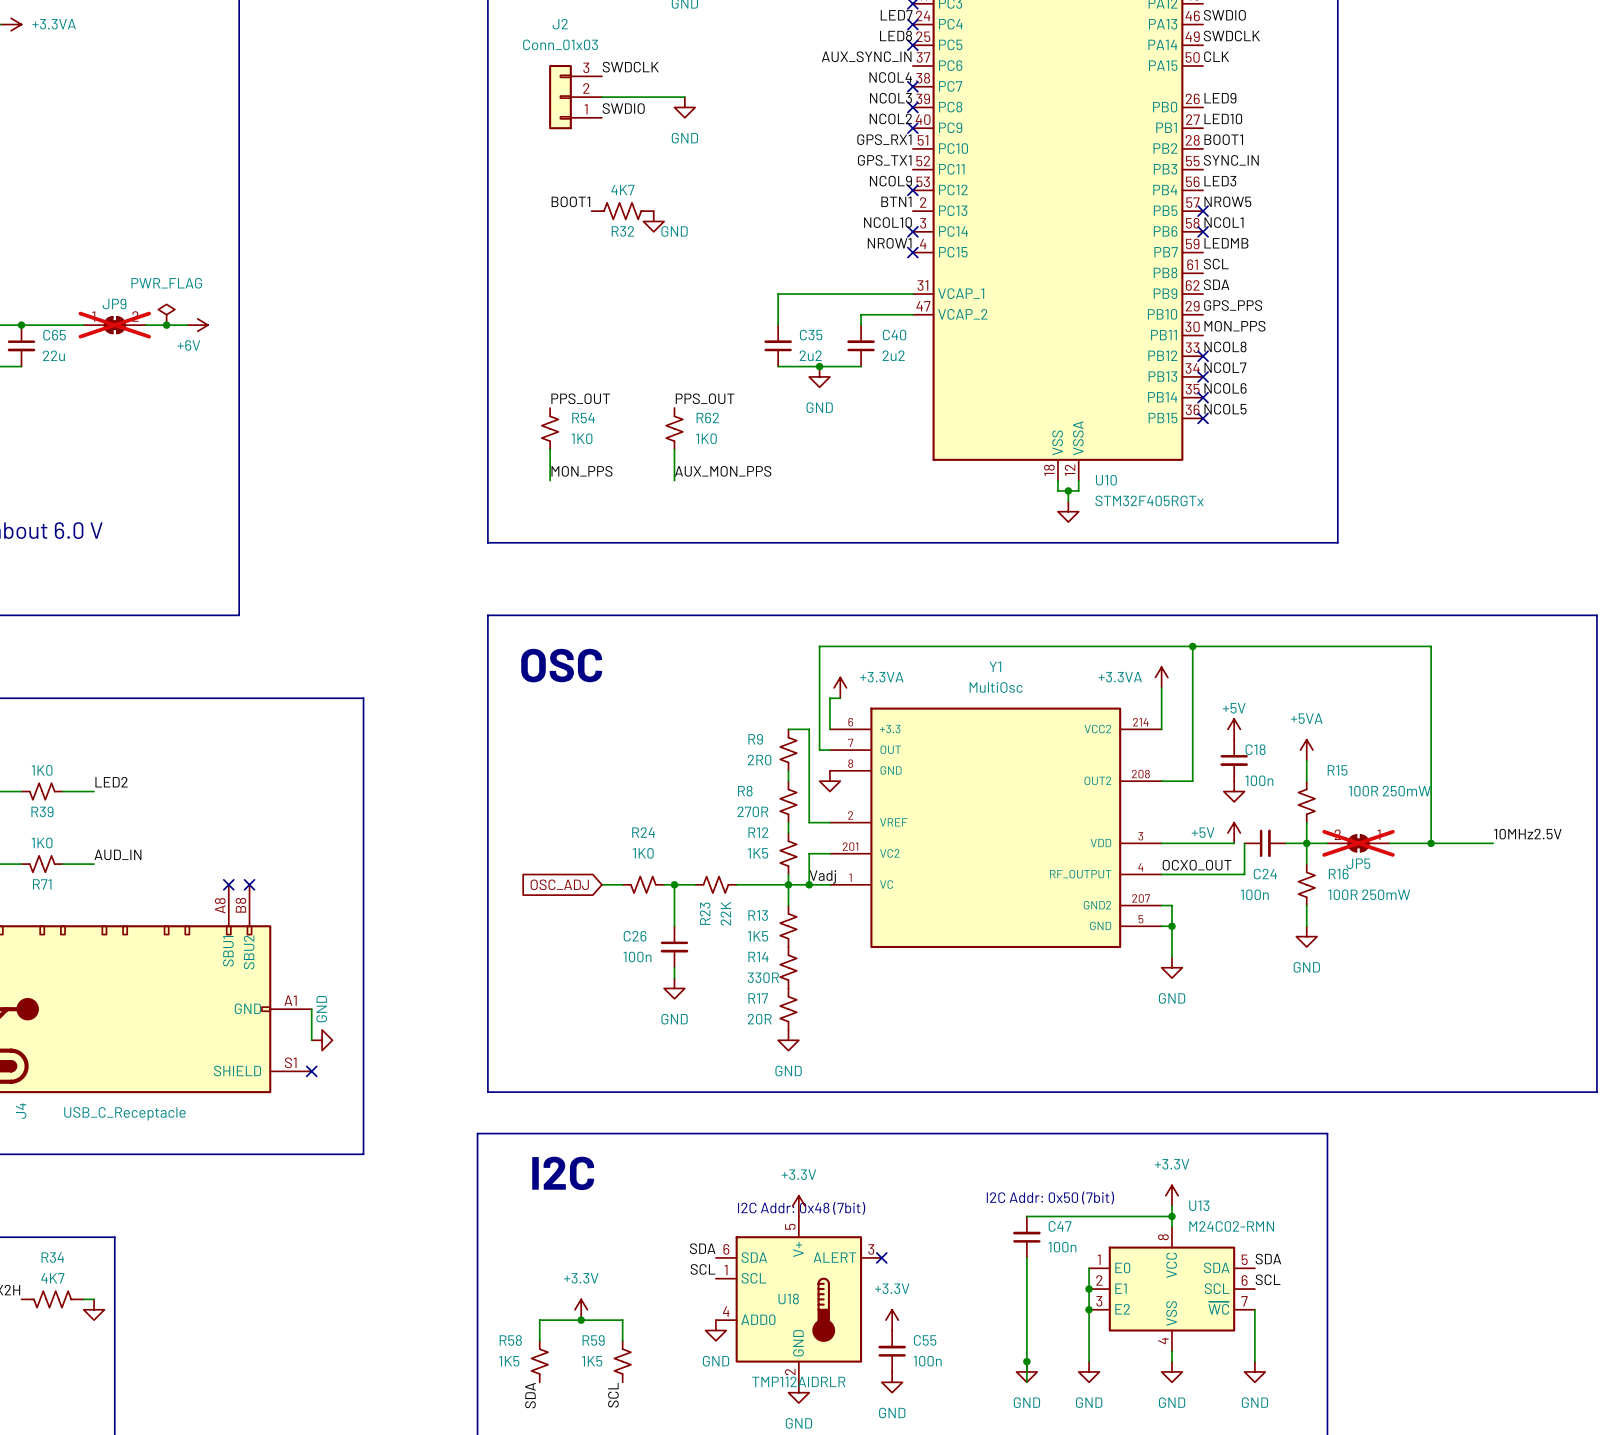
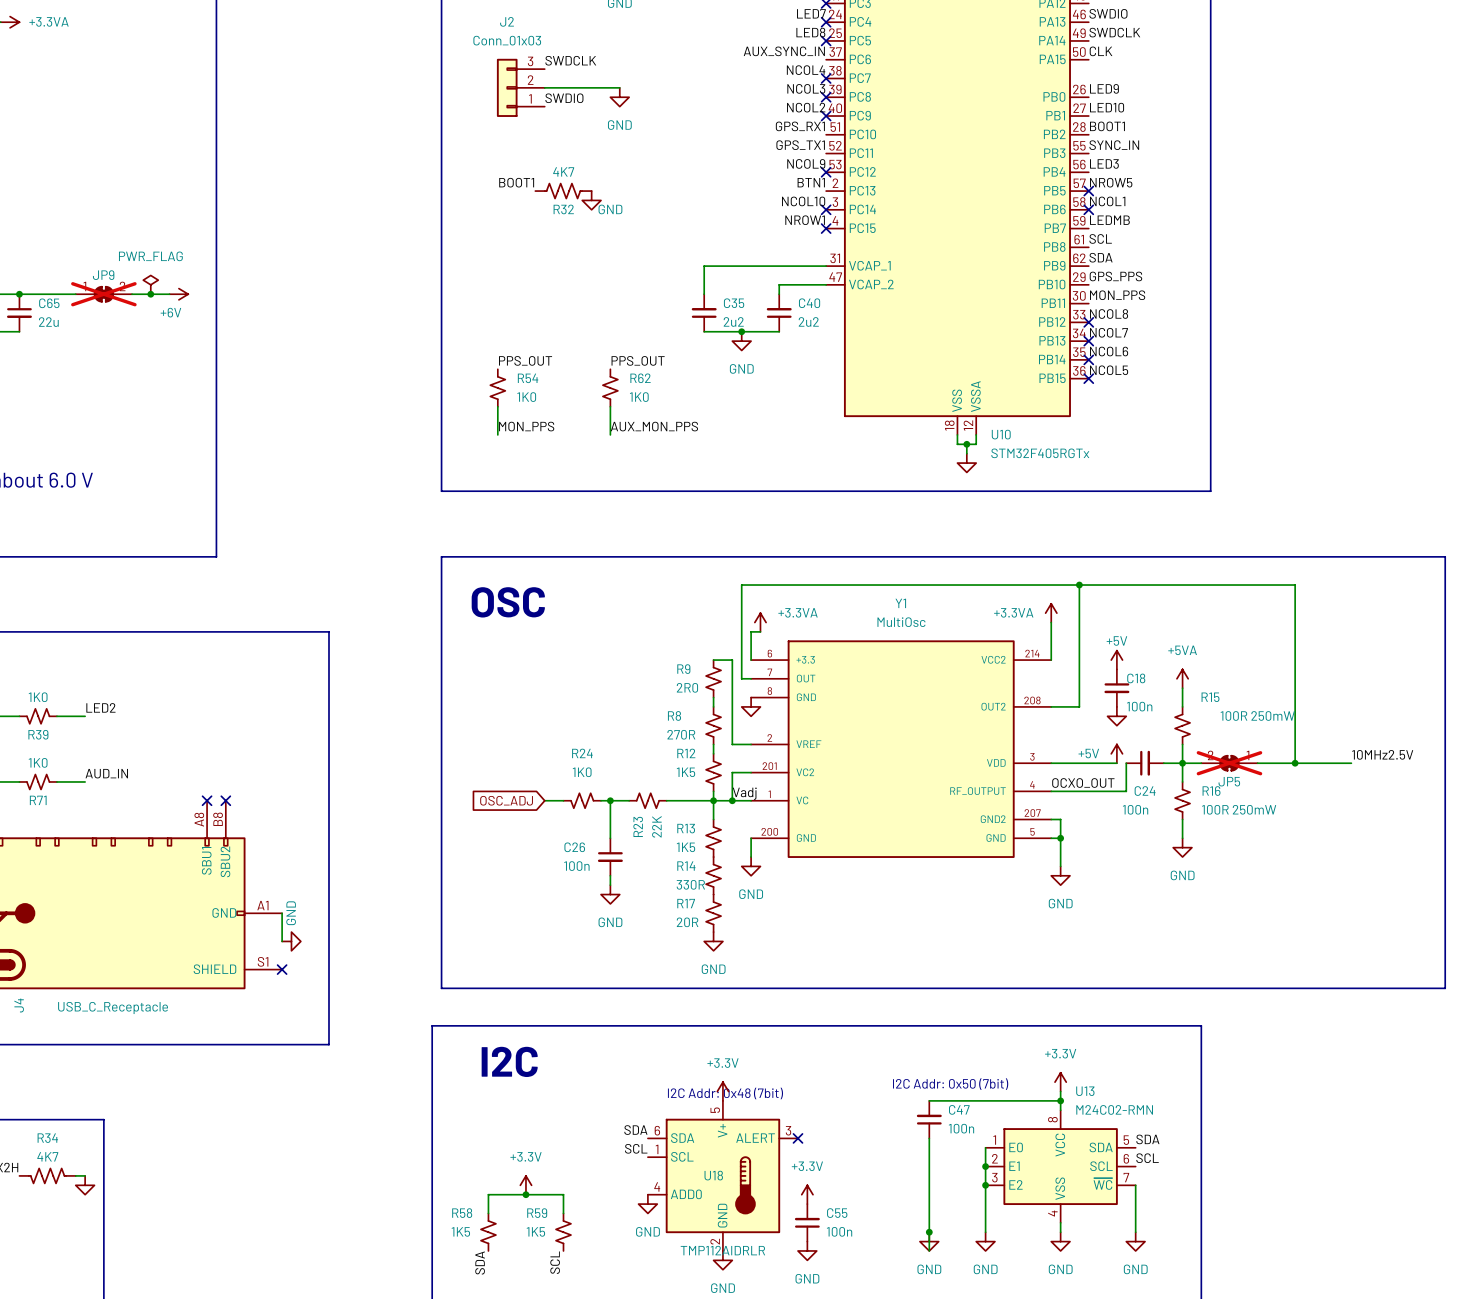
Y1 symbol: [829, 707, 1162, 949] -> [751, 640, 1052, 858]
wire: none -> (751, 838) (751, 857)
power symbol: none -> GND (751, 866)

